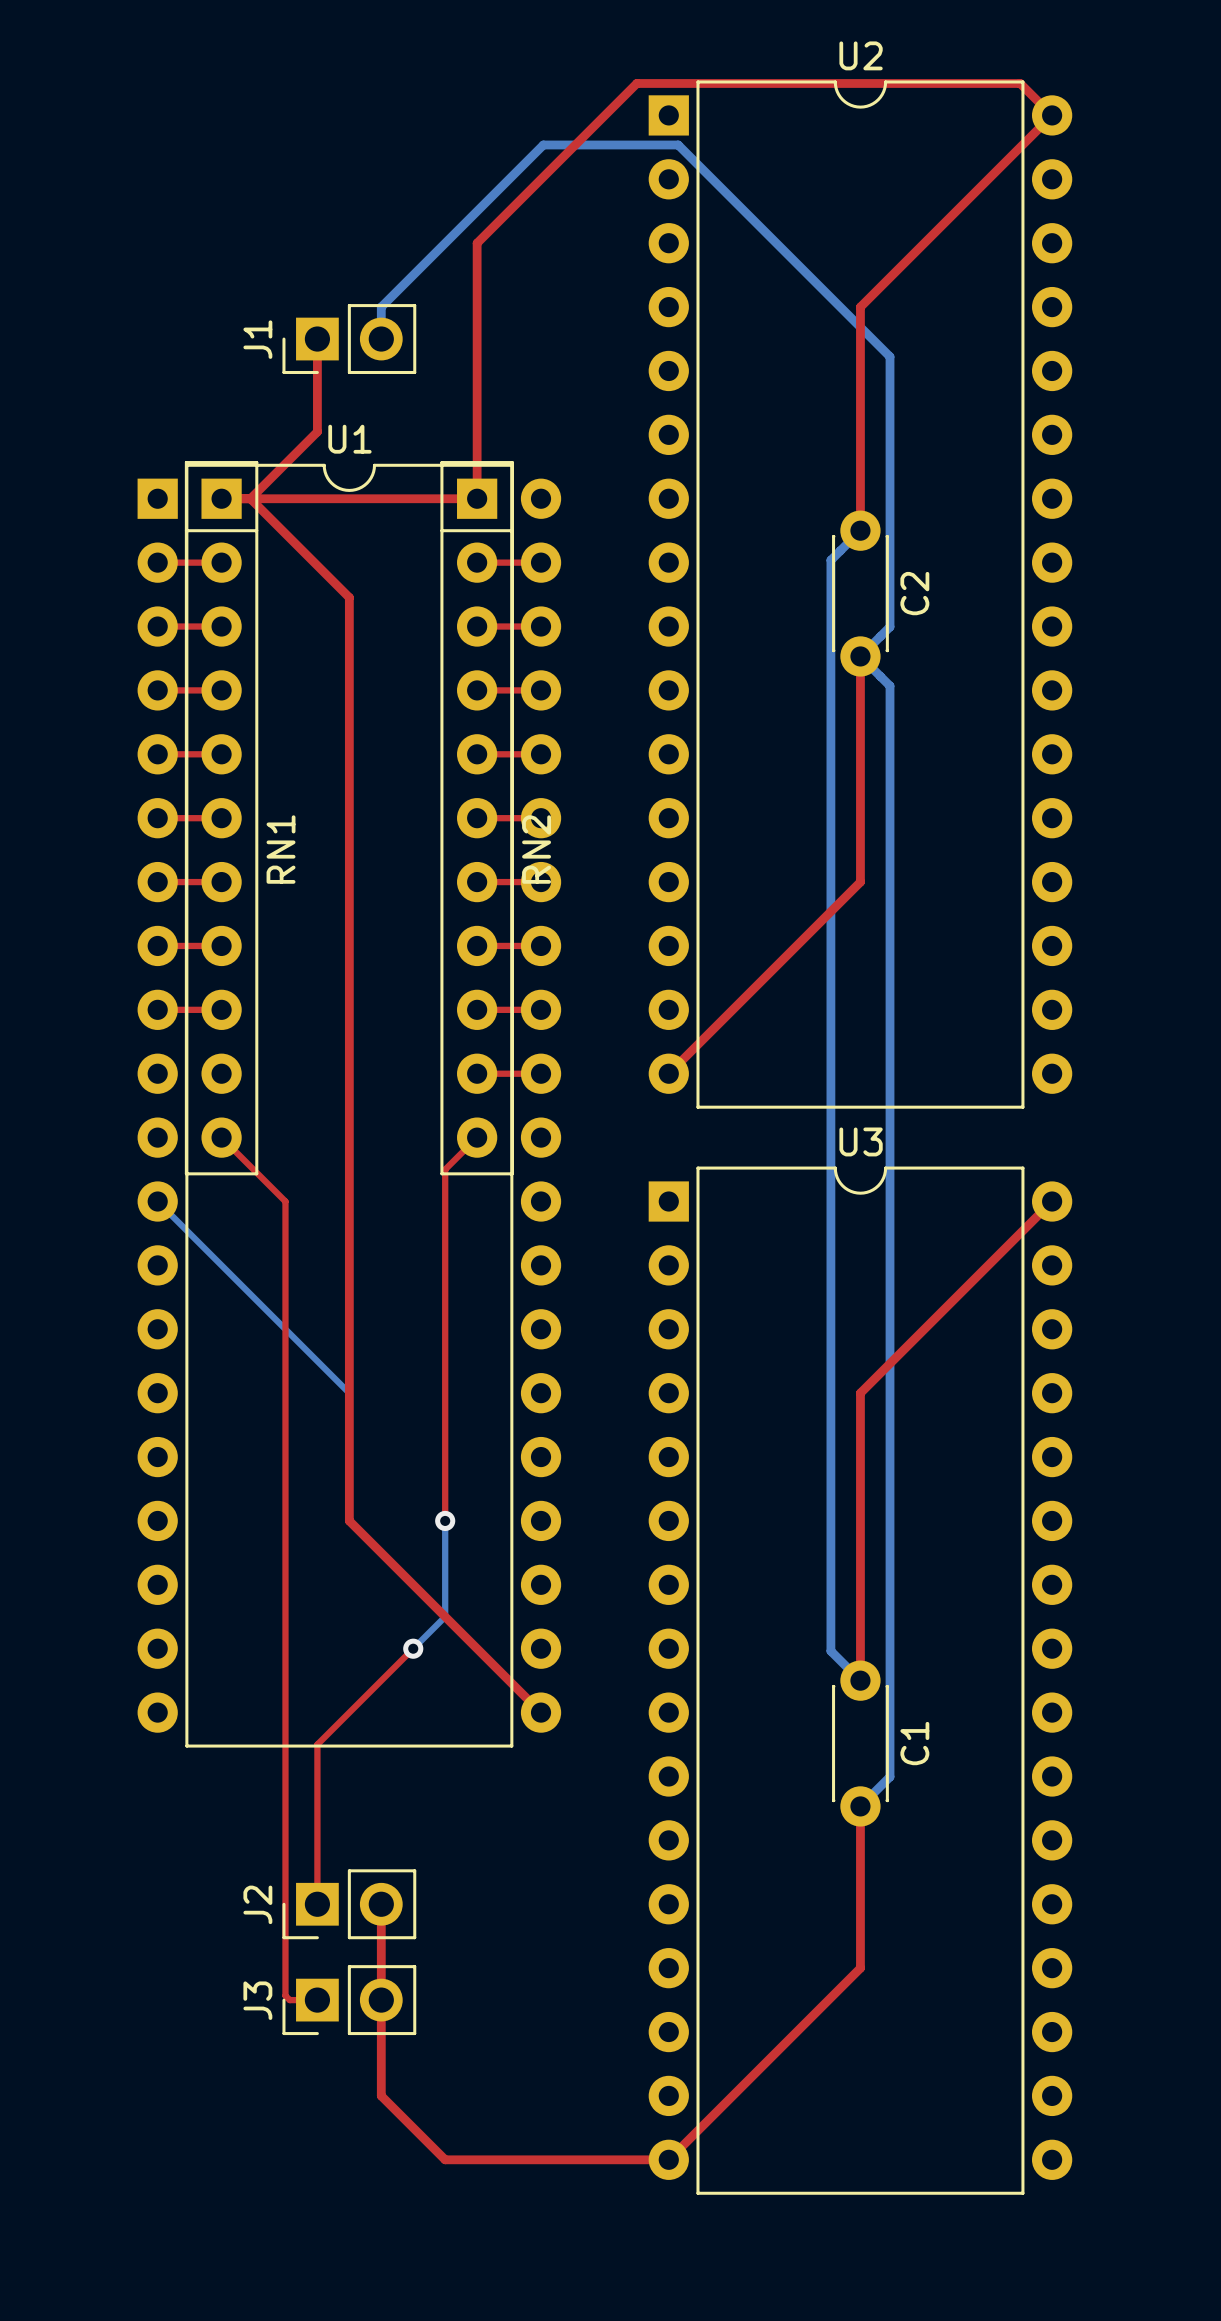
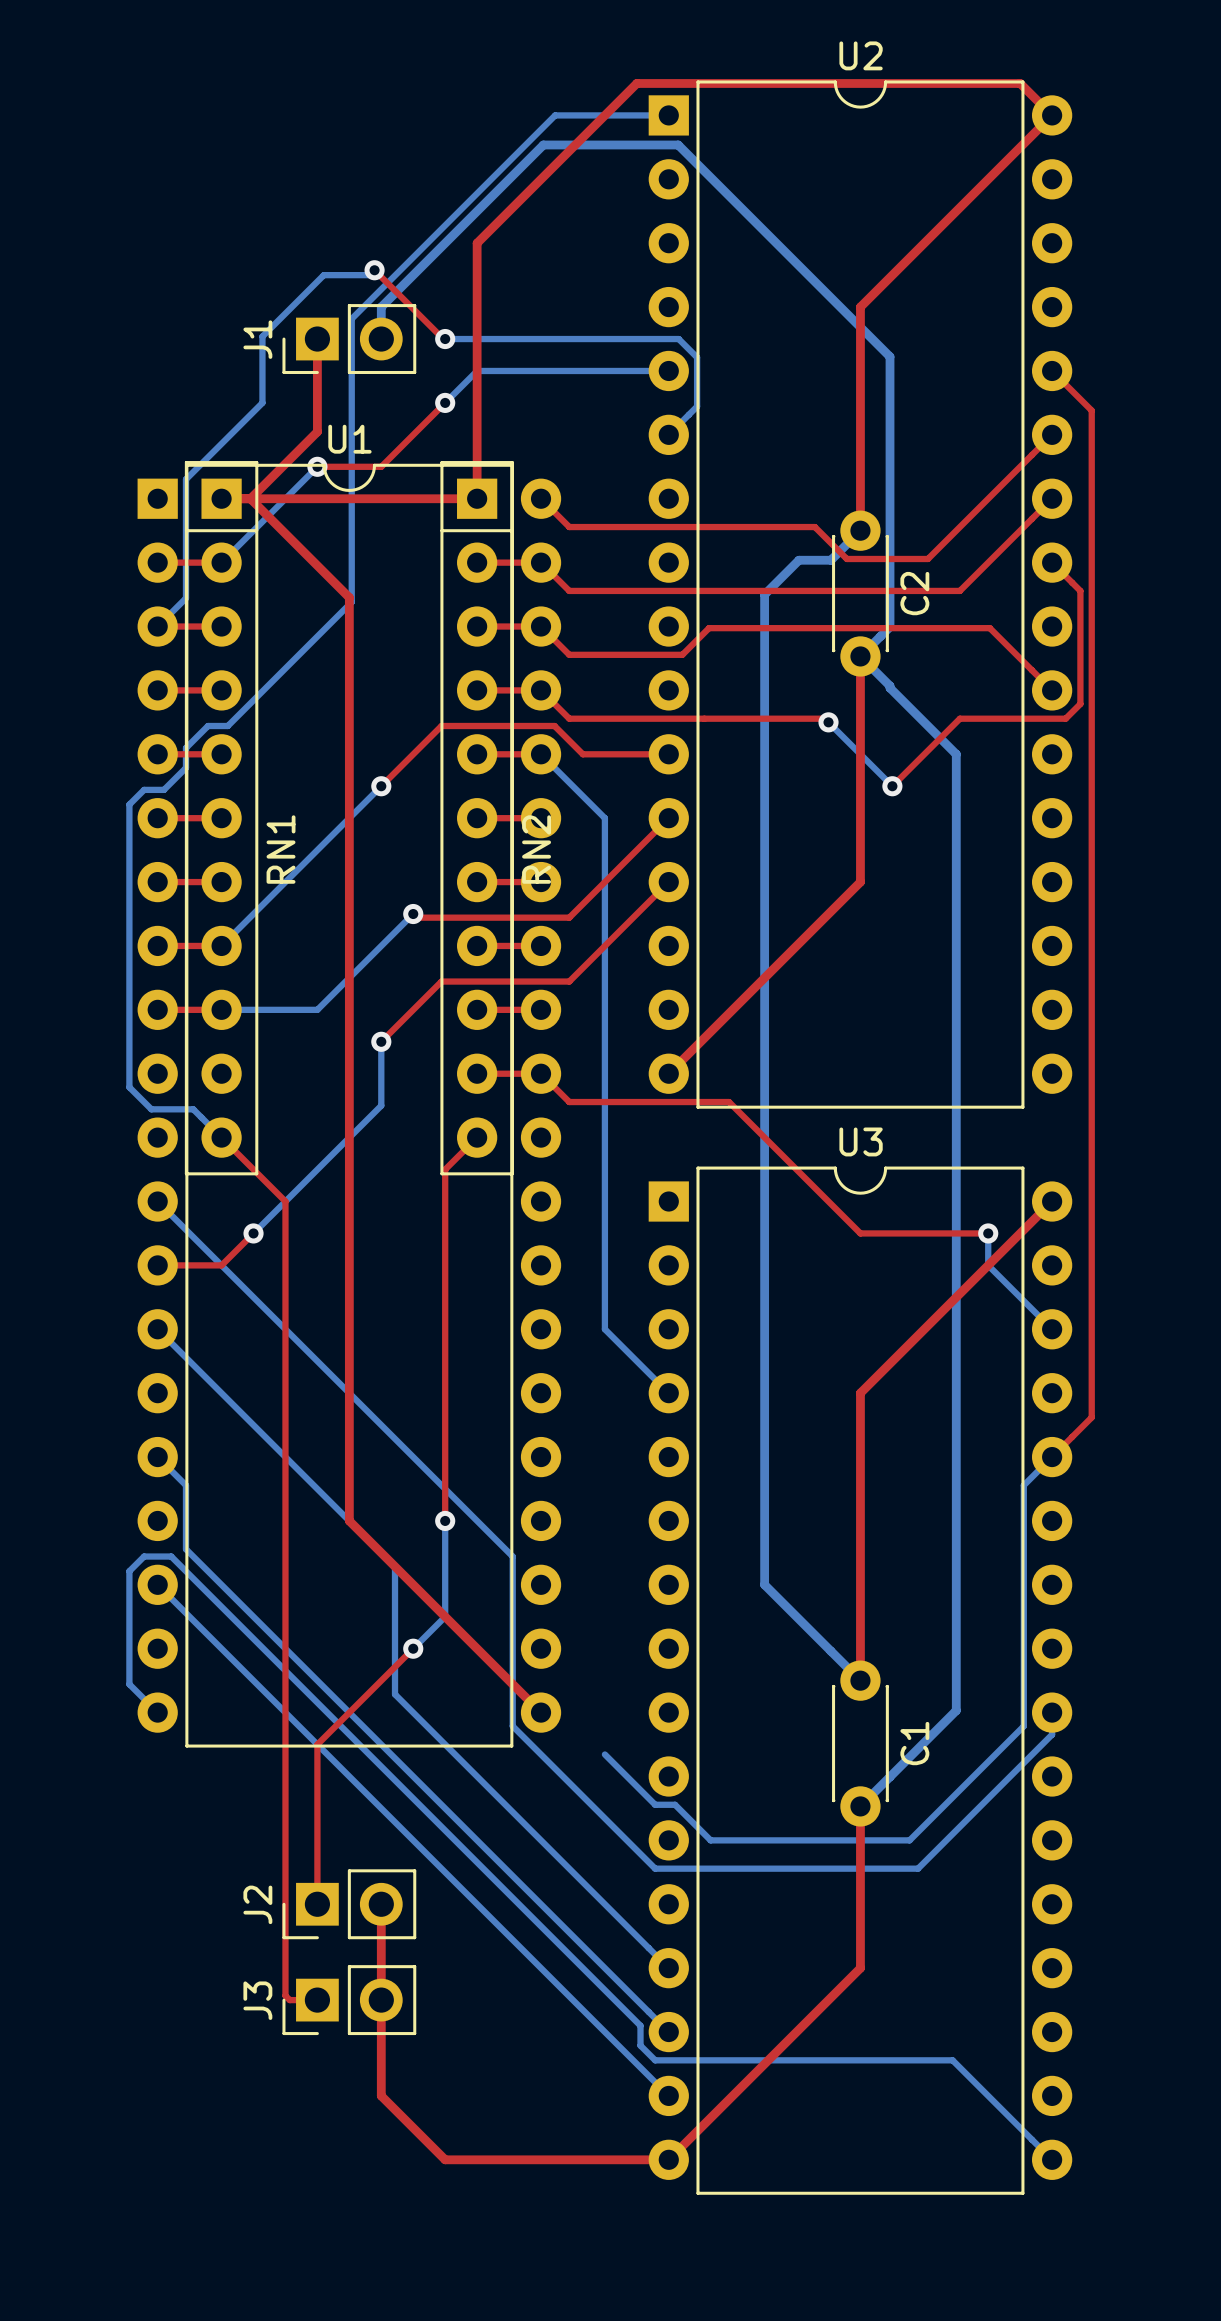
bottom track: none -> (668, 115) (555, 115) (351, 318) (351, 602) (227, 726) (208, 726) (186, 748) (186, 767) (163, 789) (144, 789) (129, 804) (129, 1087) (151, 1109) (193, 1109) (221, 1137)
top track: none -> (374, 270) (445, 339)
bottom track: none -> (374, 270) (379, 275) (323, 275) (262, 336) (262, 402) (186, 479) (186, 598) (157, 626)
via: none -> (374, 270)
bottom track: none -> (445, 339) (678, 339) (697, 357) (697, 406) (668, 434)
via: none -> (445, 339)
bottom track: none -> (668, 370) (477, 370) (445, 402)
top track: none -> (1052, 370) (1091, 410) (1091, 1417) (1052, 1457)
top track: none -> (445, 402) (381, 466) (317, 466)
via: none -> (445, 402)
top track: none -> (1052, 434) (927, 558) (846, 558) (814, 527) (569, 527) (541, 498)
bottom track: none -> (317, 466) (221, 562)
via: none -> (317, 466)
top track: none -> (1052, 498) (959, 590) (569, 590) (541, 562)
bottom track: (830, 560) (830, 1651) -> (830, 560) (798, 560) (764, 594) (764, 1584) (830, 1651)
top track: none -> (1052, 562) (1080, 590) (1080, 703) (1065, 718) (959, 718) (892, 786)
top track: none -> (541, 626) (569, 654) (682, 654) (709, 628) (989, 628) (1052, 690)
bottom track: (890, 688) (890, 1776) -> (890, 688) (956, 754) (956, 1710) (890, 1776)
top track: none -> (541, 690) (569, 718) (824, 718) (828, 722)
bottom track: none -> (828, 722) (892, 786)
via: none -> (828, 722)
bottom track: none -> (541, 754) (604, 818) (604, 1329) (668, 1393)
top track: none -> (668, 754) (582, 754) (554, 726) (441, 726) (381, 786)
bottom track: none -> (381, 786) (221, 945)
via: none -> (381, 786)
via: none -> (892, 786)
top track: none -> (668, 818) (569, 917) (409, 917) (413, 914)
top track: none -> (668, 882) (569, 981) (441, 981) (381, 1041)
bottom track: none -> (413, 914) (317, 1009) (221, 1009)
via: none -> (413, 914)
bottom track: none -> (381, 1041) (381, 1105) (253, 1233)
via: none -> (381, 1041)
top track: none -> (541, 1073) (569, 1102) (729, 1102) (860, 1233) (988, 1233)
top track: none -> (253, 1233) (221, 1265) (157, 1265)
via: none -> (253, 1233)
bottom track: none -> (988, 1233) (988, 1265) (1052, 1329)
via: none -> (988, 1233)
bottom track: none -> (157, 1329) (395, 1566) (395, 1694) (668, 1968)
bottom track: none -> (349, 1393) (512, 1556) (512, 1726) (655, 1868) (918, 1868) (1052, 1734) (1052, 1712)
bottom track: none -> (157, 1457) (186, 1485) (186, 1549) (668, 2032)
bottom track: none -> (1052, 1457) (1023, 1485) (1023, 1726) (909, 1840) (710, 1840) (675, 1804) (655, 1804) (604, 1754)
bottom track: none -> (157, 1584) (668, 2095)
bottom track: none -> (157, 1712) (129, 1684) (129, 1571) (144, 1556) (171, 1556) (640, 2025) (640, 2045) (655, 2060) (952, 2060) (1052, 2159)

